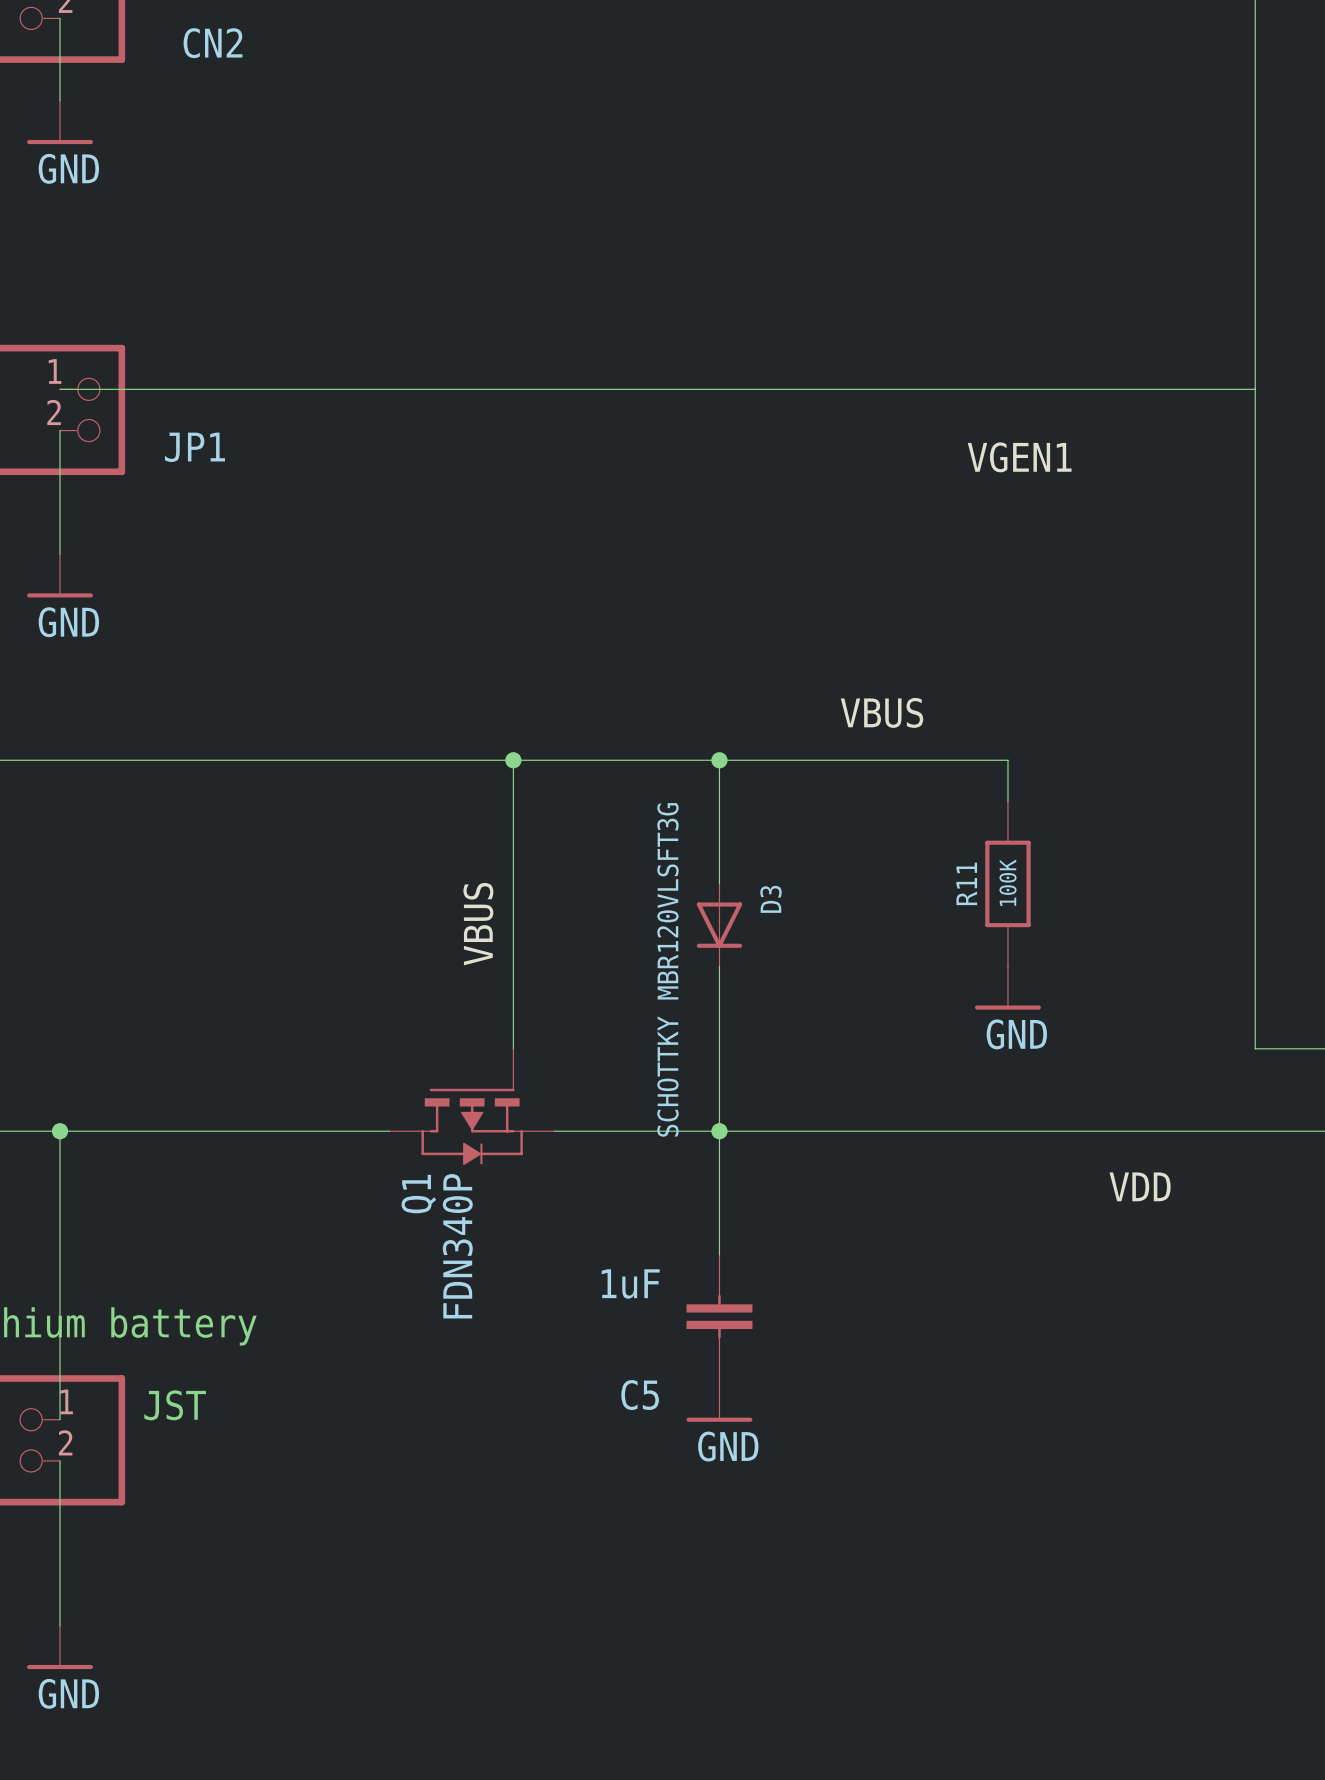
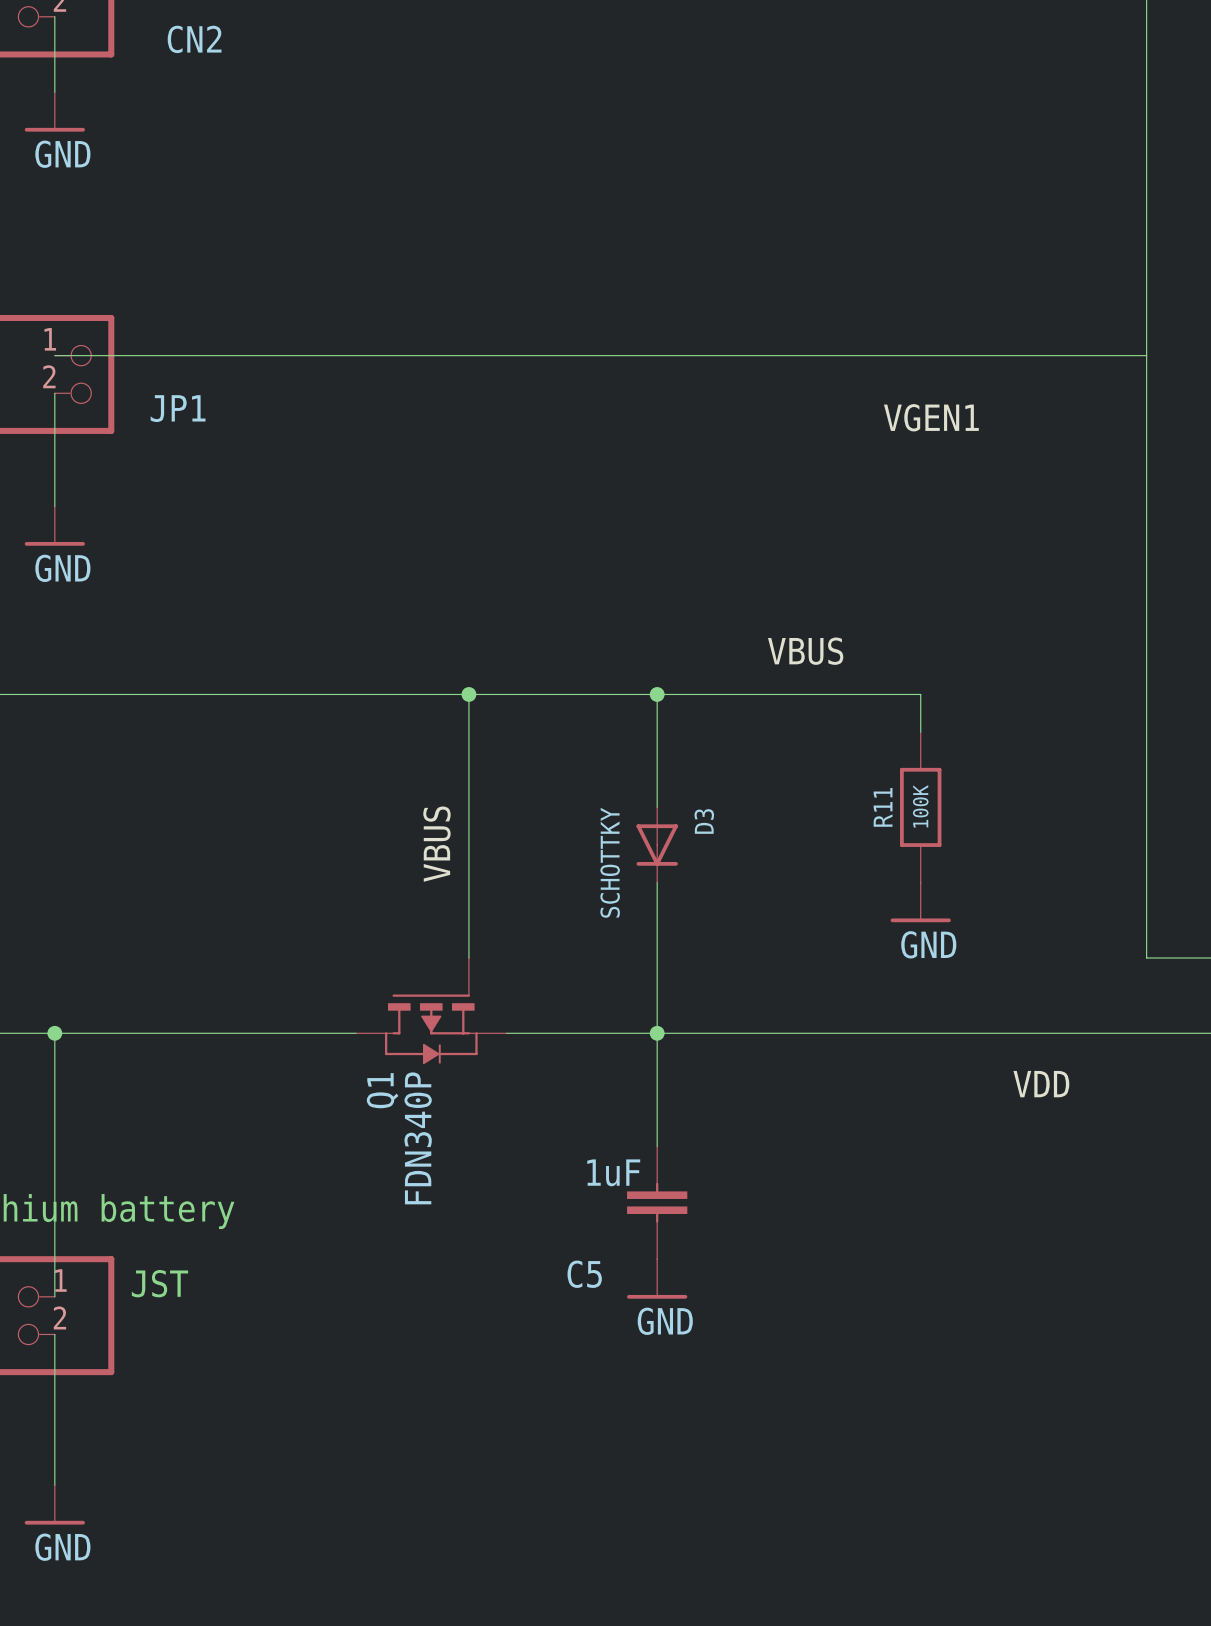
D3 value: SCHOTTKY MBR120VLSFT3G (667, 969) -> SCHOTTKY (610, 862)
C5 value position: 1uF (630, 1284) -> 1uF (613, 1172)

